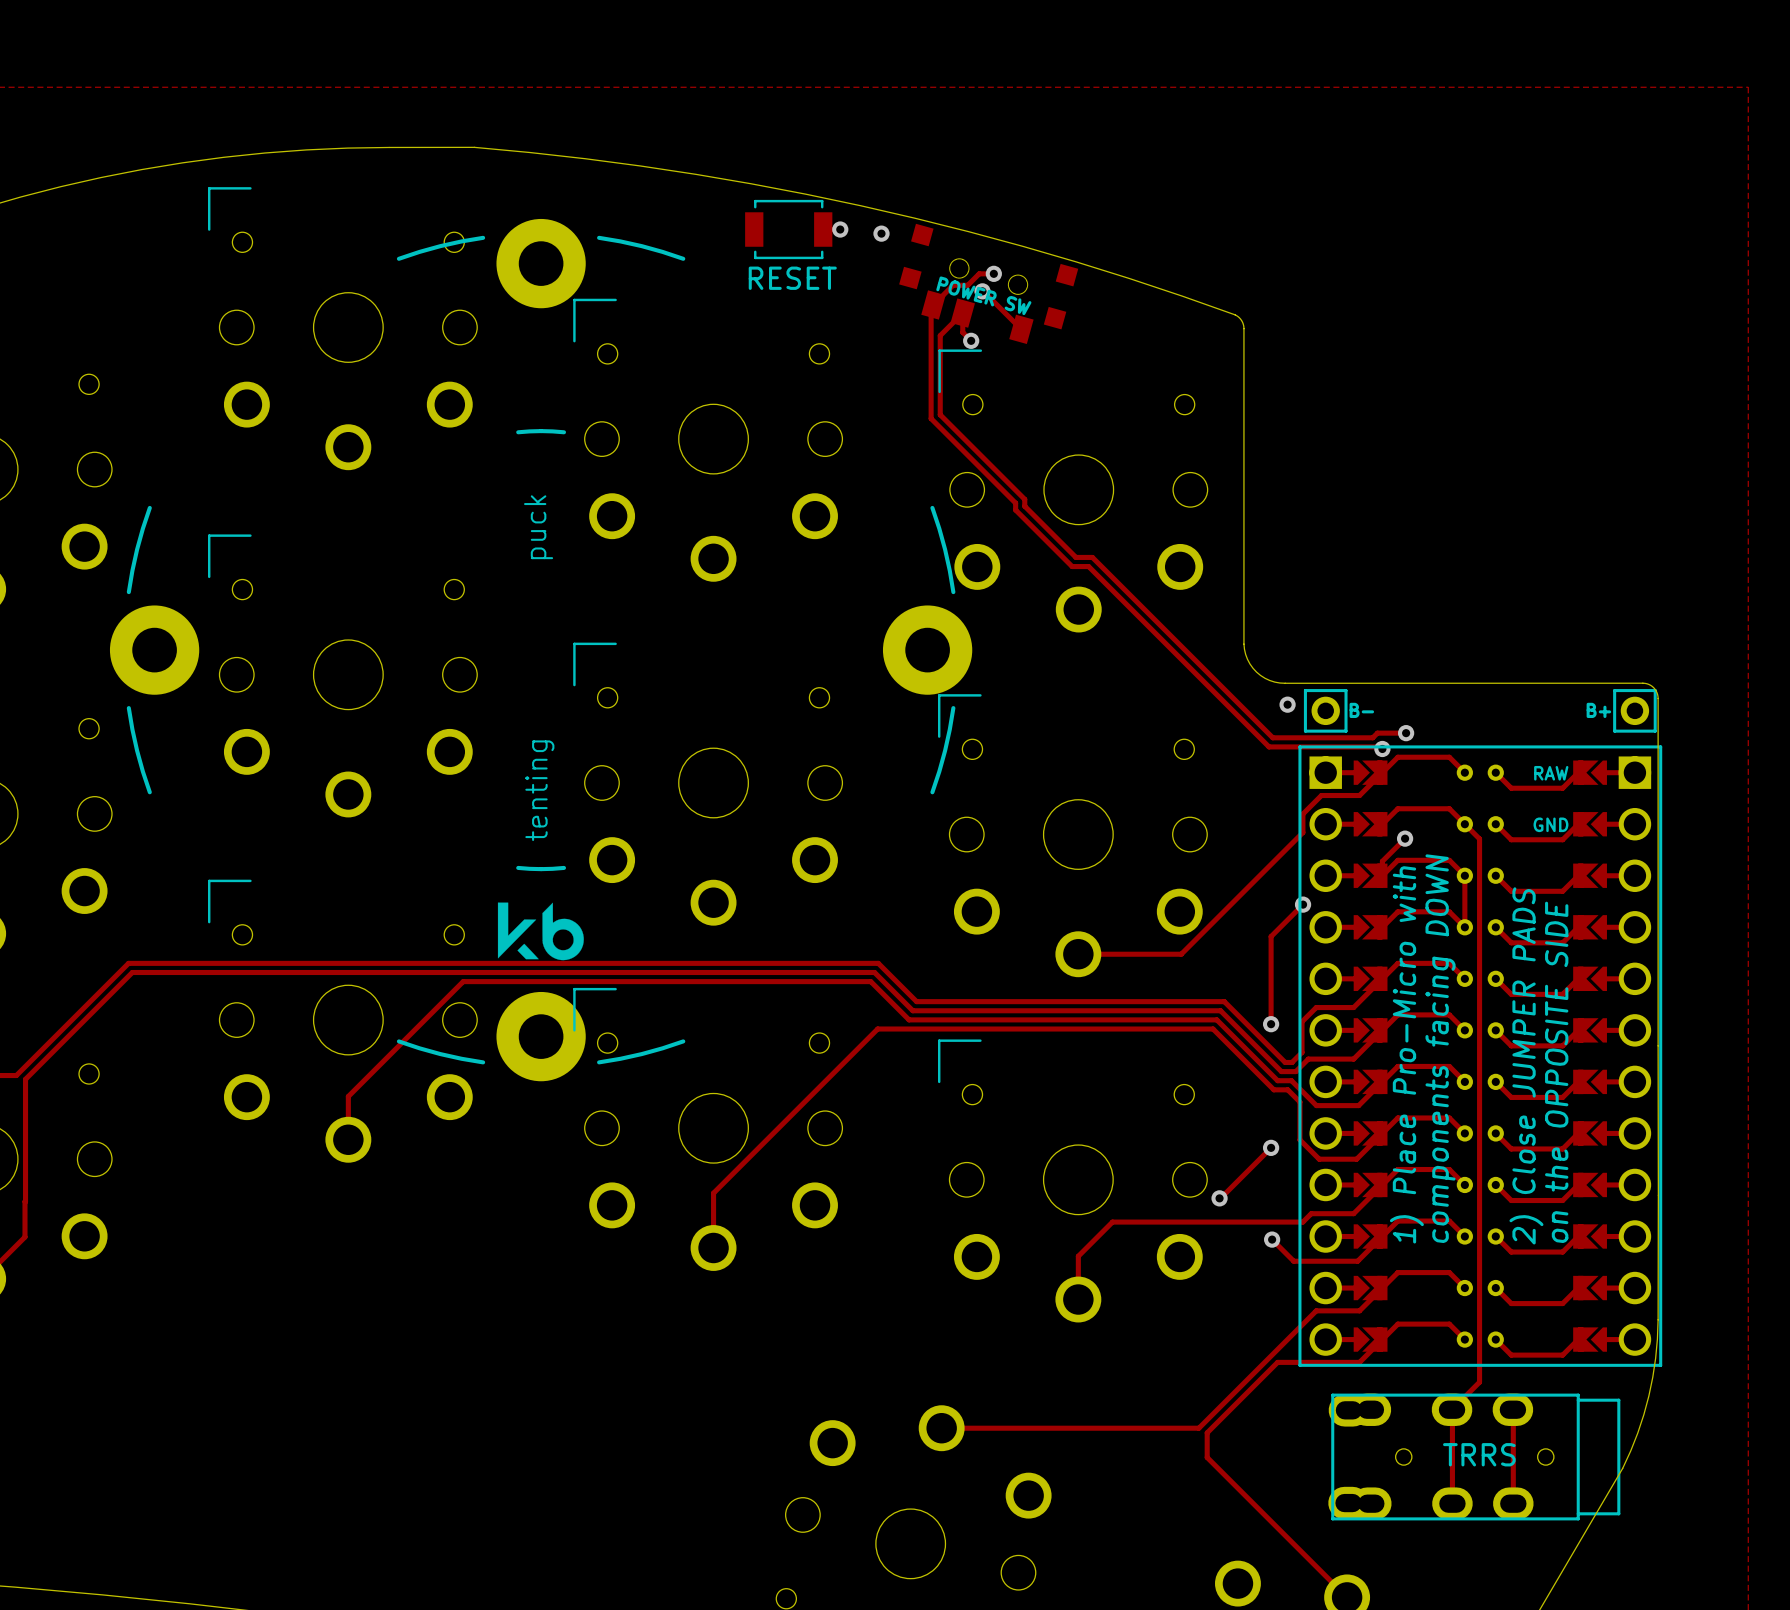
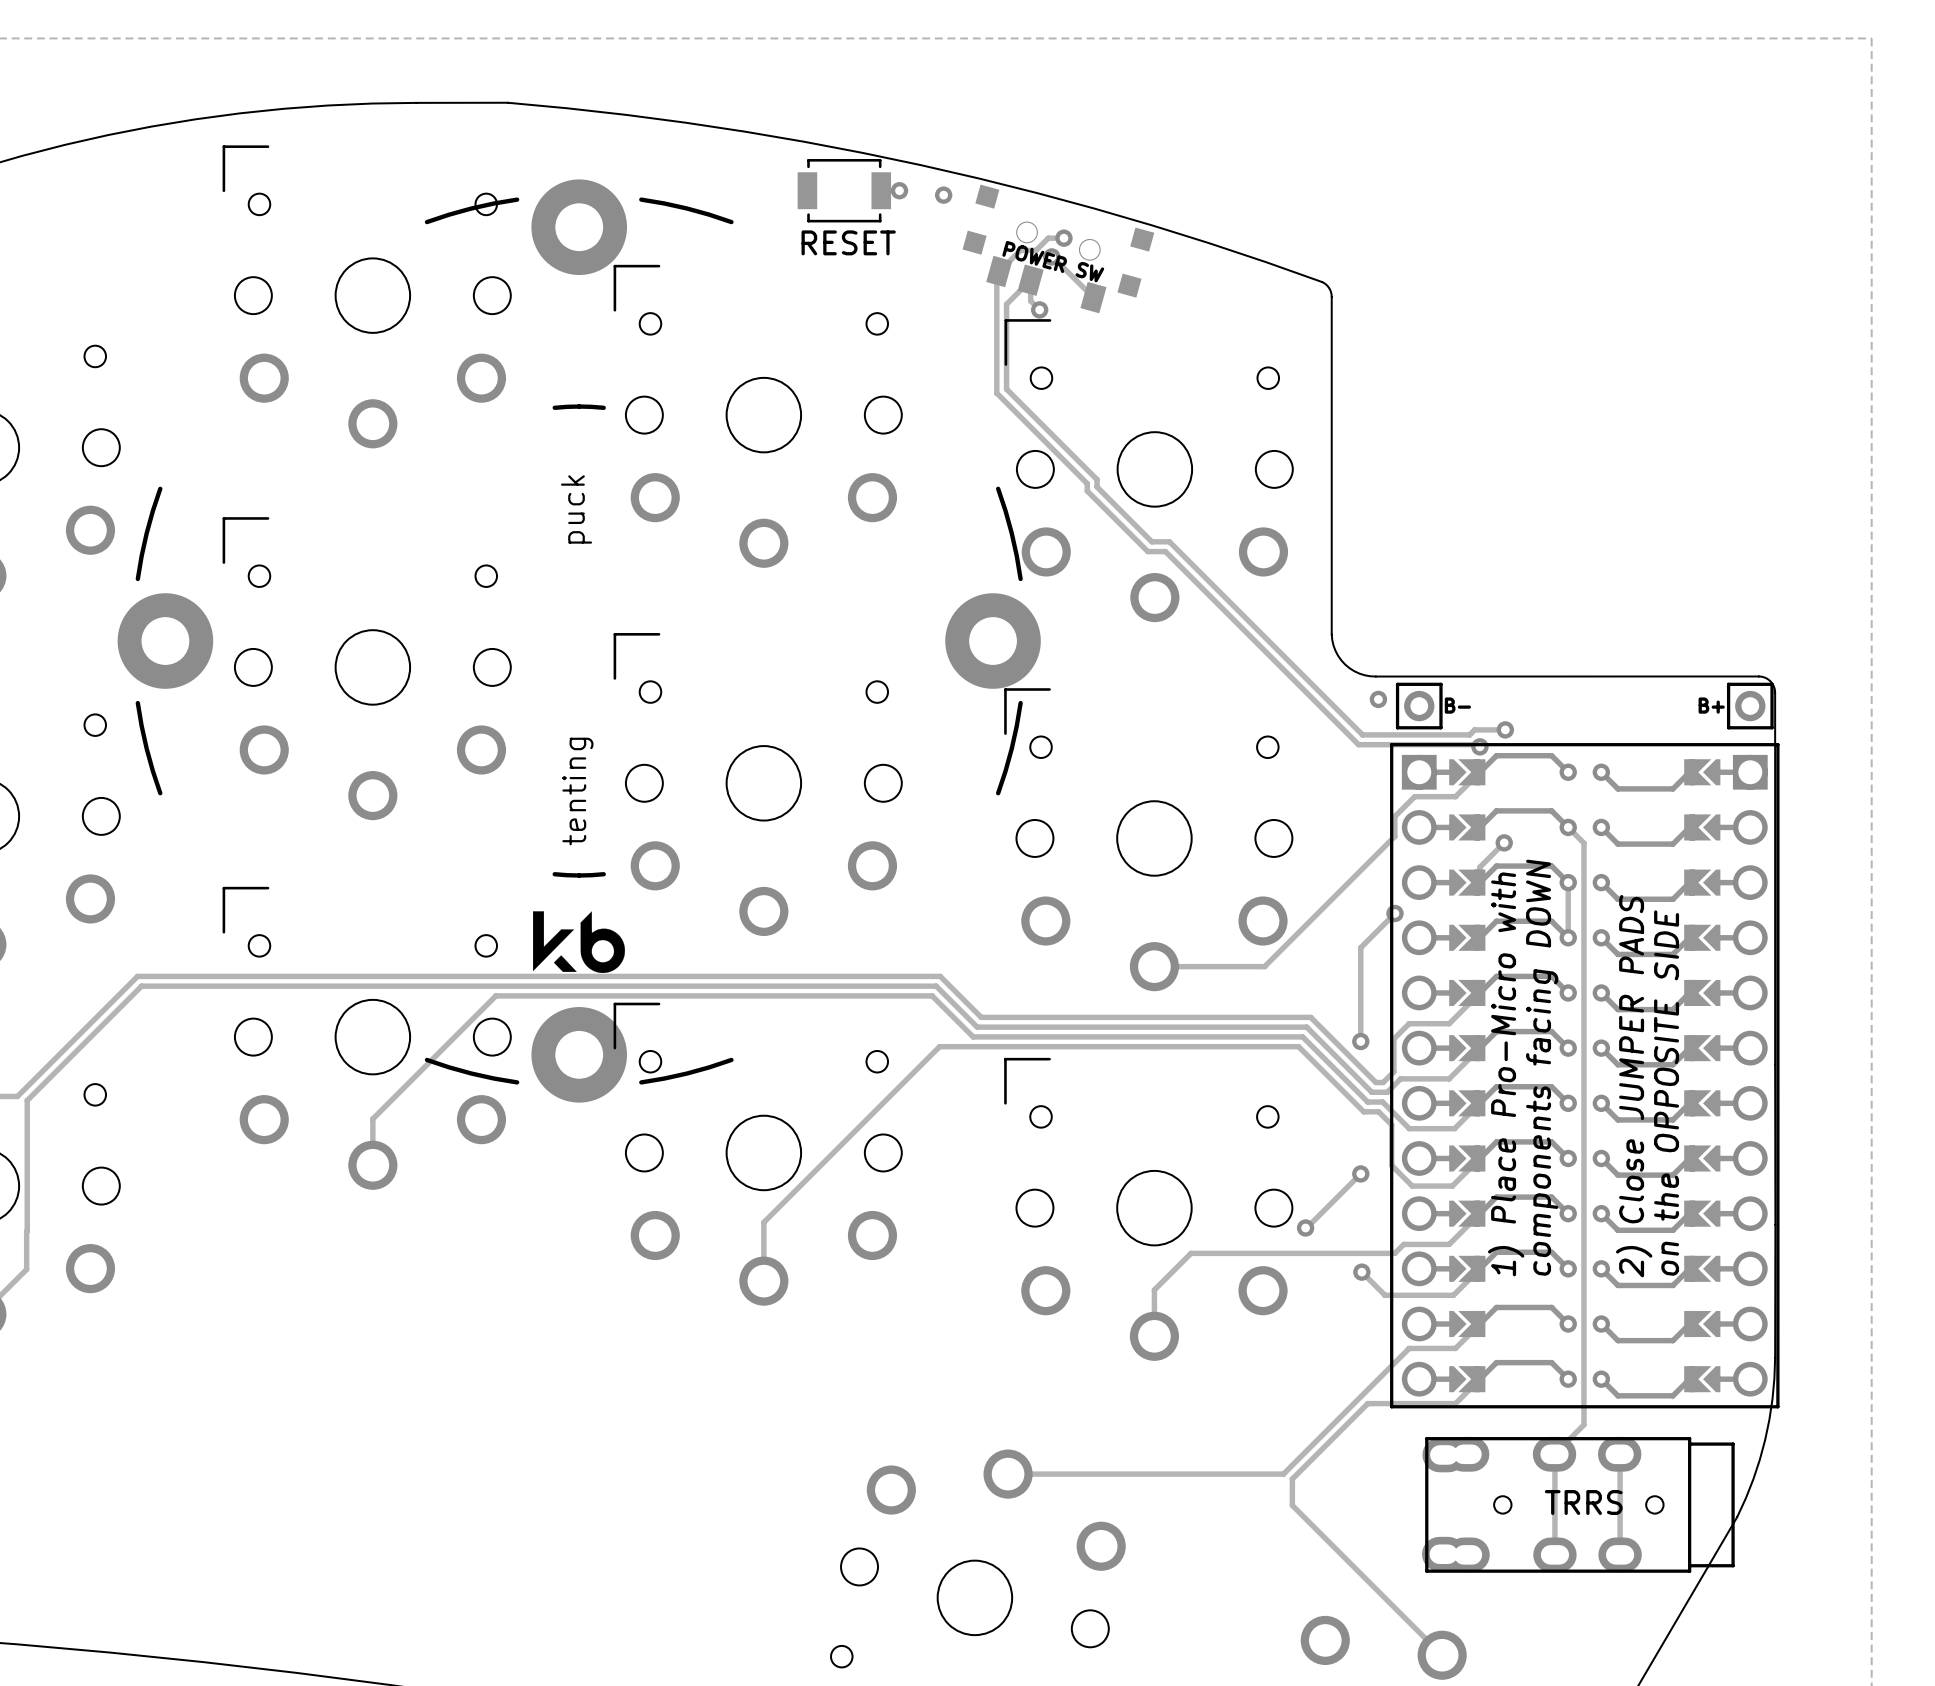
text: RAW (1551, 773) -> none
text: GND (1550, 824) -> none

